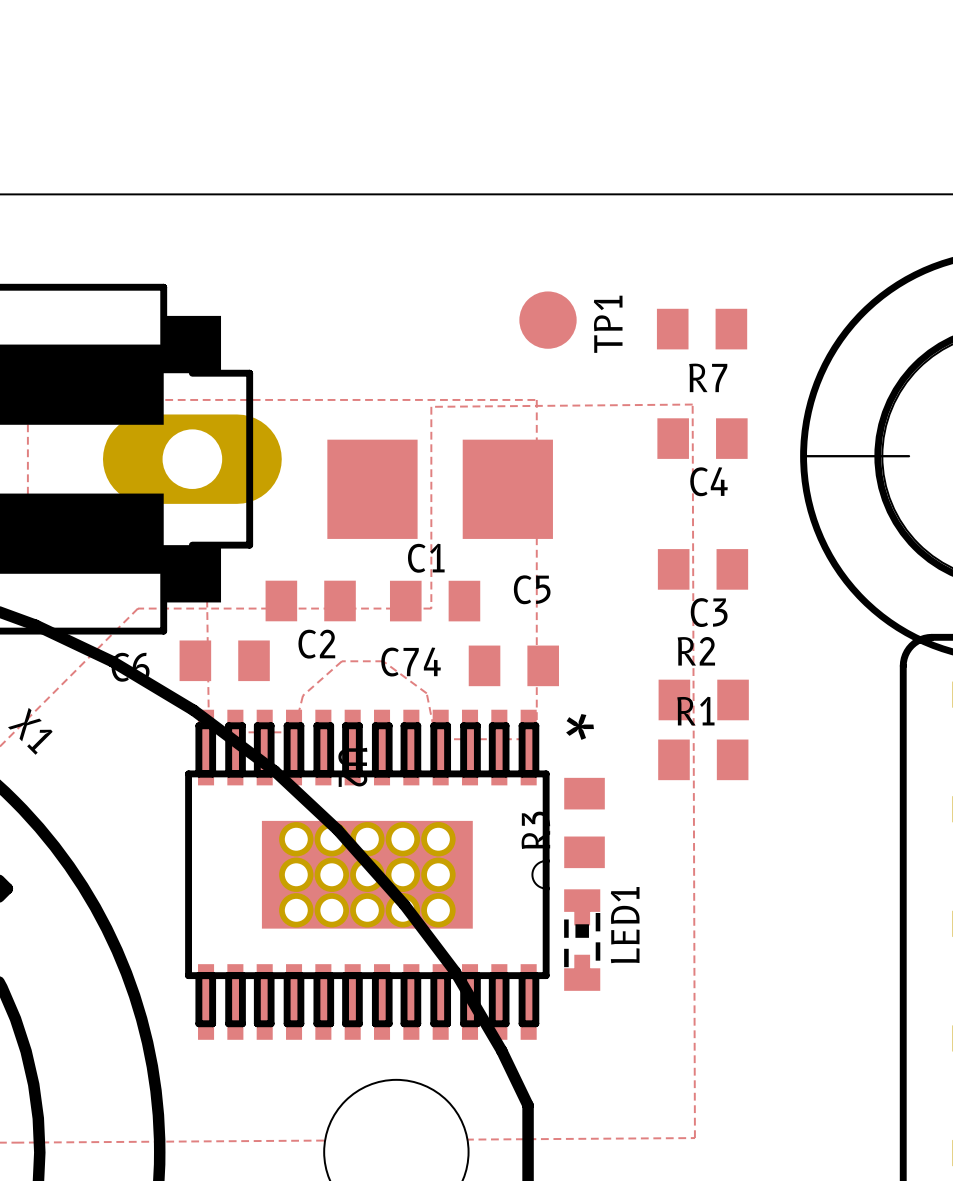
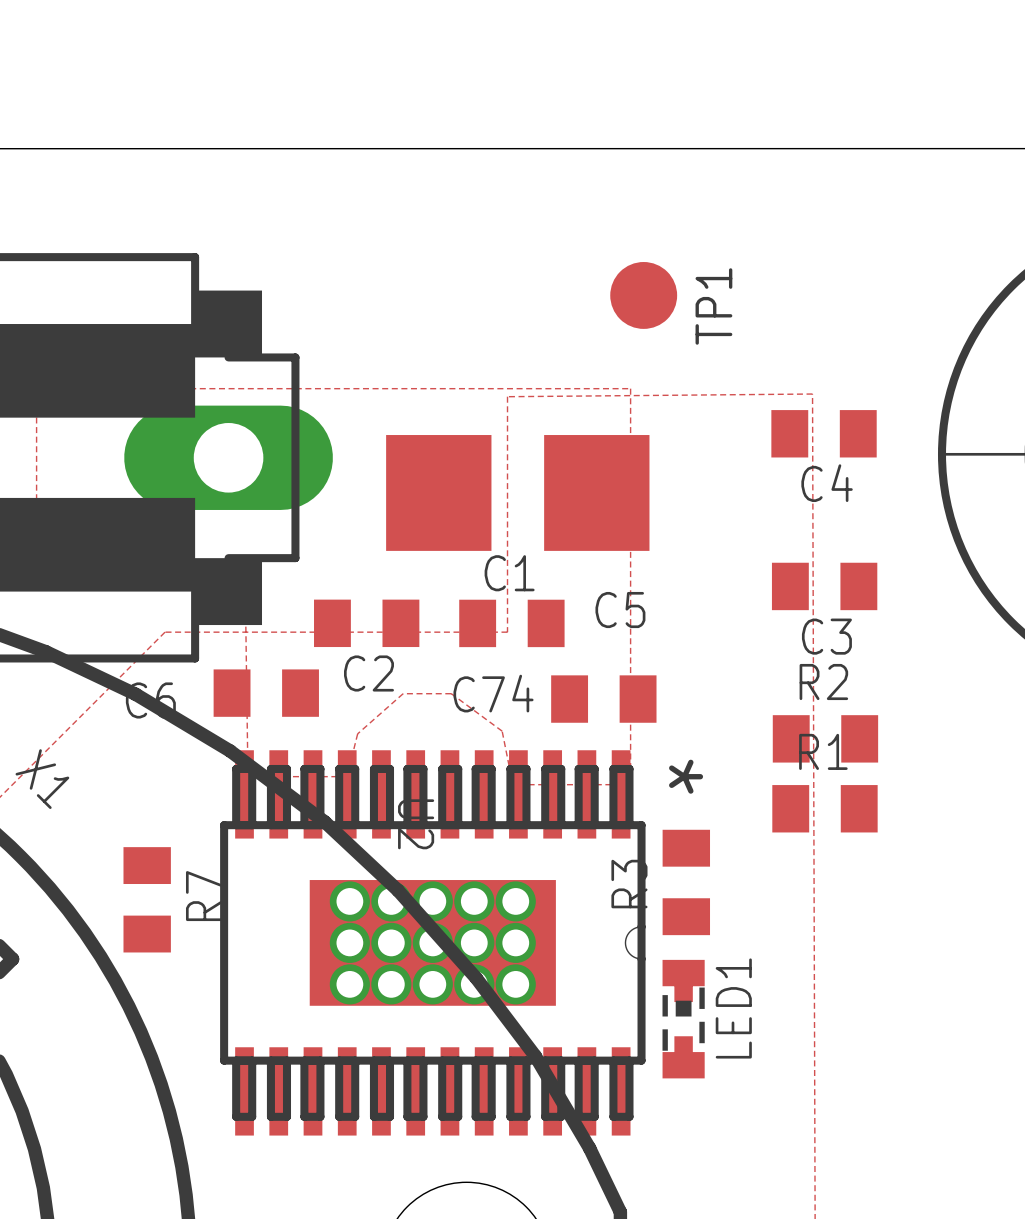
R7 rotation: 0° (702, 329) -> 90° clockwise (147, 899)
R7 position: (702, 329) -> (147, 899)

